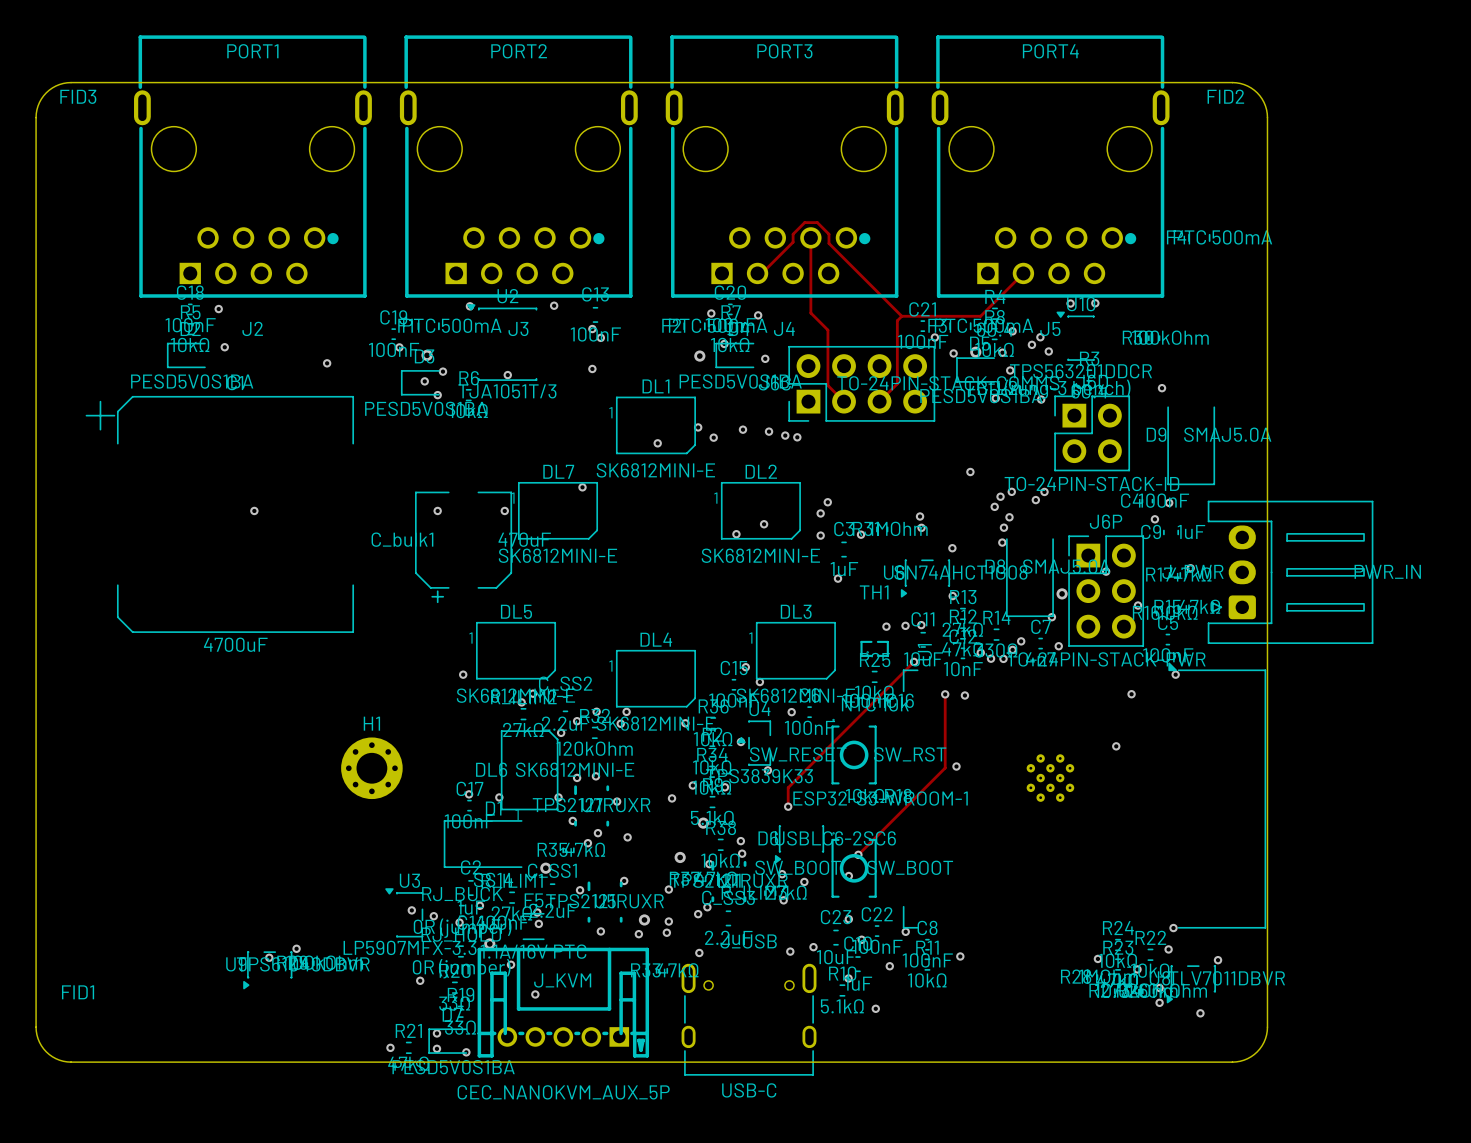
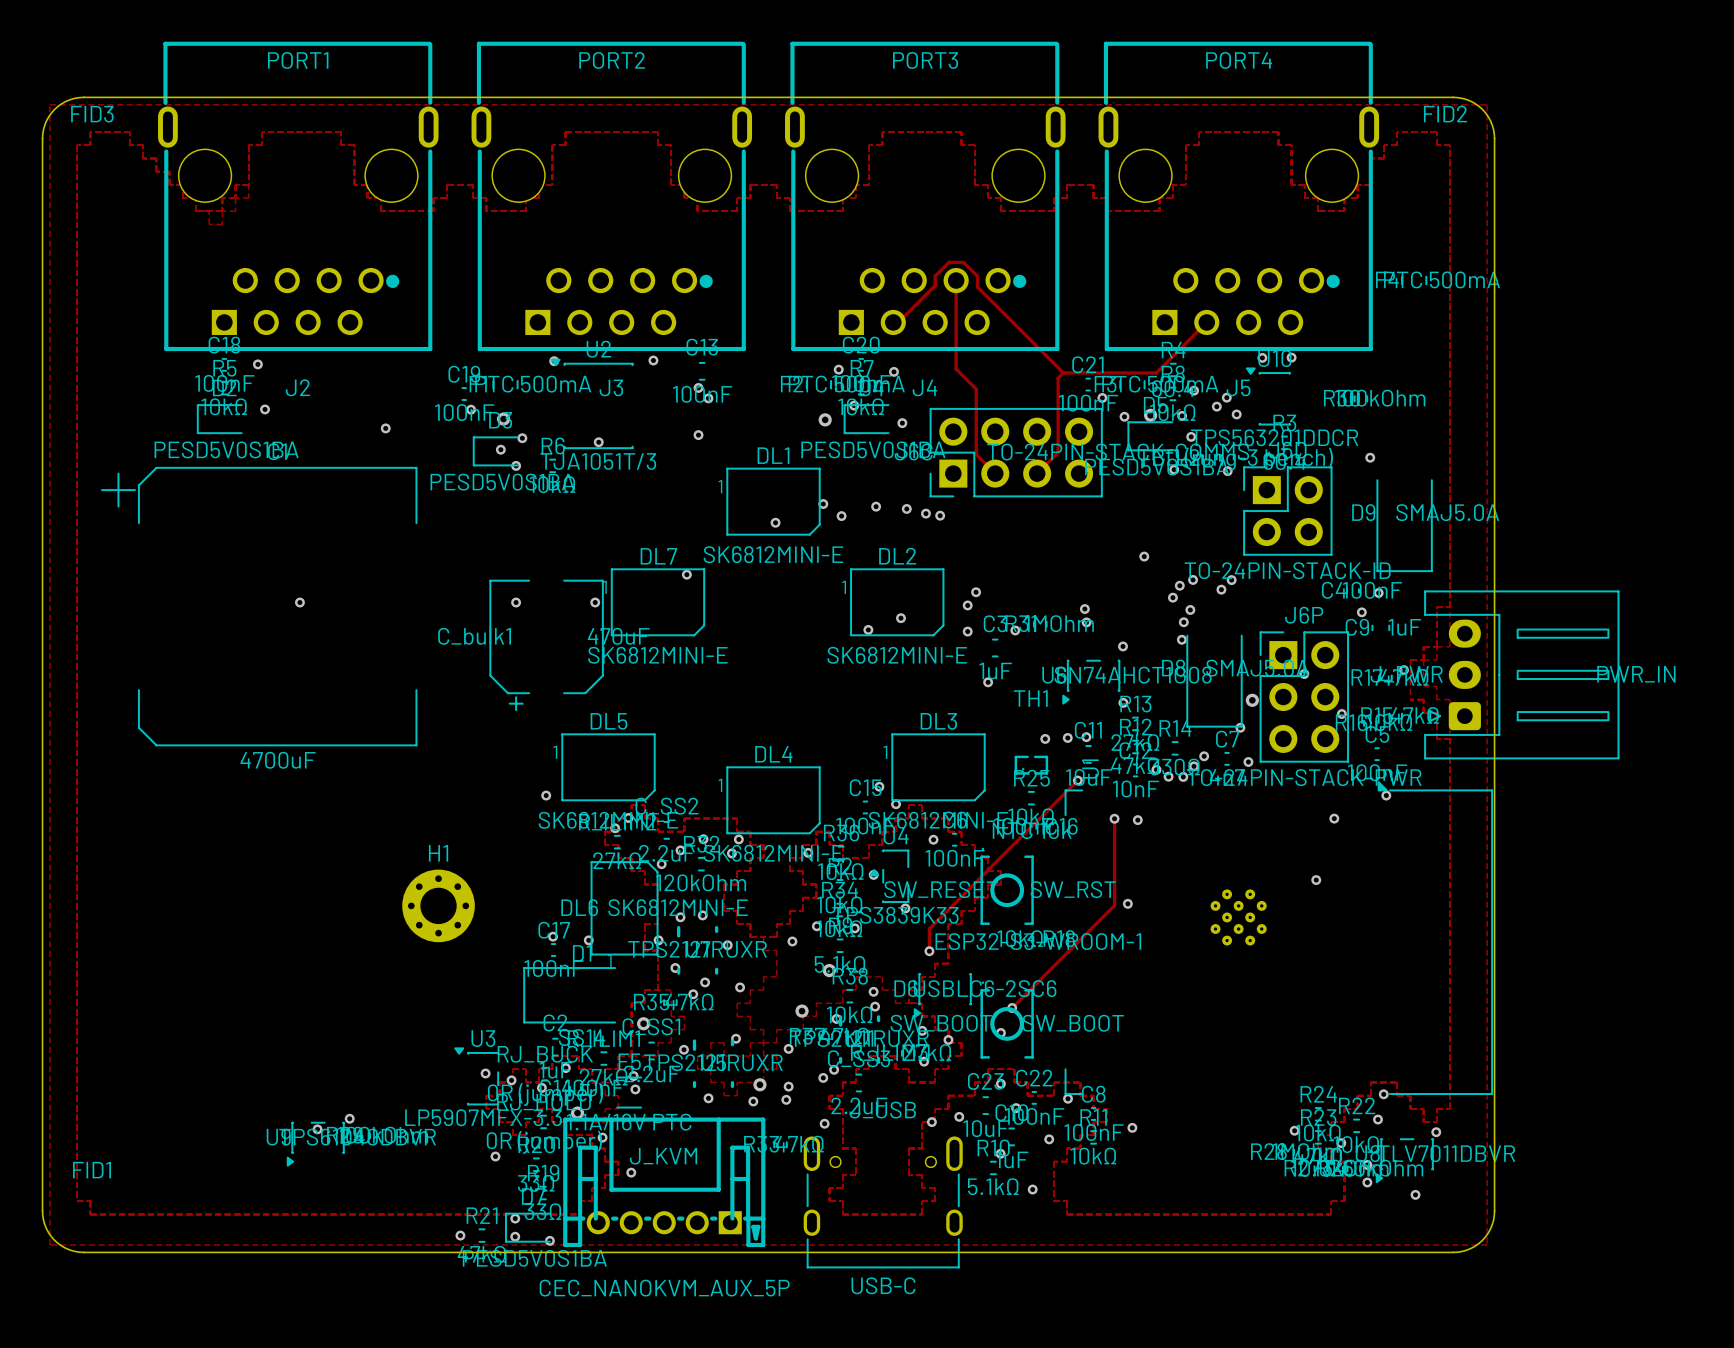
zone outline: none -> (49, 104) (1487, 104) (1487, 1244) (49, 1244) (49, 104)
zone outline: none -> (248, 184) (235, 184) (235, 211) (195, 211) (195, 198) (182, 198) (182, 184) (169, 184) (169, 171) (156, 171) (156, 158) (143, 158) (143, 145) (129, 145) (129, 132) (90, 132) (90, 145) (77, 145) (77, 1201) (90, 1201) (90, 1214) (578, 1214) (578, 1201) (591, 1201) (591, 1188) (605, 1188) (605, 1174) (618, 1174) (618, 1161) (605, 1161) (605, 1148) (591, 1148) (591, 1122) (605, 1122) (605, 1108) (618, 1108) (618, 1095) (605, 1095) (605, 1069) (631, 1069) (631, 1003) (644, 1003) (644, 990) (671, 990) (671, 1016) (684, 1016) (684, 1029) (671, 1029) (671, 1042) (657, 1042) (657, 1056) (618, 1056) (618, 1082) (591, 1082) (591, 1069) (578, 1069) (578, 1056) (552, 1056) (552, 1069) (539, 1069) (539, 1082) (525, 1082) (525, 1069) (512, 1069) (512, 1082) (499, 1082) (499, 1095) (486, 1095) (486, 1108) (499, 1108) (499, 1122) (512, 1122) (512, 1135) (525, 1135) (525, 1122) (539, 1122) (539, 1108) (552, 1108) (552, 1122) (565, 1122) (565, 1135) (591, 1135)
zone outline: none -> (209, 211) (209, 224) (222, 224) (222, 198) (248, 198) (248, 145) (261, 145) (261, 132) (341, 132) (341, 145) (354, 145) (354, 184) (367, 184) (367, 198) (380, 198) (380, 211) (433, 211) (433, 198) (446, 198) (446, 184) (473, 184) (473, 198) (486, 198) (486, 211) (525, 211) (525, 198) (539, 198) (539, 184) (552, 184) (552, 145) (565, 145) (565, 132) (657, 132) (657, 145) (671, 145) (671, 184) (684, 184) (684, 198) (697, 198) (697, 211) (737, 211) (737, 198) (750, 198) (750, 184) (776, 184) (776, 198) (789, 198) (789, 211) (842, 211) (842, 198) (855, 198) (855, 184) (869, 184) (869, 145) (882, 145) (882, 132) (961, 132) (961, 145) (974, 145) (974, 184) (987, 184) (987, 198) (1001, 198) (1001, 211) (1053, 211) (1053, 198) (1067, 198) (1067, 184) (1093, 184) (1093, 198) (1106, 198) (1106, 211) (1159, 211) (1159, 198) (1172, 198) (1172, 184) (1186, 184) (1186, 145) (1199, 145) (1199, 132) (1278, 132) (1278, 145) (1291, 145) (1291, 184) (1304, 184) (1304, 198) (1318, 198) (1318, 211) (1344, 211) (1344, 198) (1357, 198) (1357, 184) (1370, 184) (1370, 158) (1384, 158) (1384, 145) (1397, 145) (1397, 132) (1436, 132) (1436, 145) (1450, 145) (1450, 646) (1423, 646) (1423, 686) (1436, 686) (1436, 699) (1450, 699) (1450, 1108) (1436, 1108) (1436, 1122) (1423, 1122) (1423, 1108) (1410, 1108) (1410, 1095) (1397, 1095) (1397, 1082) (1370, 1082) (1370, 1095) (1357, 1095) (1357, 1108) (1344, 1108) (1344, 1122) (1331, 1122) (1331, 1135) (1318, 1135) (1318, 1148) (1331, 1148) (1331, 1161) (1344, 1161) (1344, 1201) (1331, 1201) (1331, 1214) (1067, 1214) (1067, 1201) (1053, 1201) (1053, 1161) (1067, 1161) (1067, 1148) (1080, 1148) (1080, 1135) (1093, 1135) (1093, 1122) (1106, 1122) (1106, 1108) (1093, 1108) (1093, 1095) (1080, 1095) (1080, 1082) (1053, 1082) (1053, 1095) (1027, 1095) (1027, 1082) (1014, 1082) (1014, 1069) (987, 1069) (987, 1082) (974, 1082) (974, 1095) (948, 1095) (948, 1108) (935, 1108) (935, 1122) (921, 1122) (921, 1148) (908, 1148) (908, 1174) (921, 1174) (921, 1188) (935, 1188) (935, 1201) (921, 1201) (921, 1214) (842, 1214) (842, 1201) (829, 1201) (829, 1188) (842, 1188) (842, 1174) (855, 1174) (855, 1148) (842, 1148) (842, 1108) (829, 1108) (829, 1095) (842, 1095) (842, 1082) (855, 1082) (855, 1069) (869, 1069) (869, 1056) (895, 1056) (895, 1069) (908, 1069) (908, 1082) (935, 1082) (935, 1069) (948, 1069) (948, 1056) (961, 1056) (961, 1042) (948, 1042) (948, 1029) (935, 1029) (935, 1016) (921, 1016) (921, 1003) (895, 1003) (895, 990) (882, 990) (882, 976) (855, 976) (855, 990) (842, 990) (842, 1003) (816, 1003) (816, 1016) (803, 1016) (803, 1029) (776, 1029) (776, 1042) (750, 1042) (750, 1056) (723, 1056) (723, 1042) (710, 1042) (710, 1056) (697, 1056) (697, 1069) (710, 1069) (710, 1082) (723, 1082) (723, 1095) (737, 1095) (737, 1082) (763, 1082) (763, 1069) (776, 1069) (776, 1056) (763, 1056) (763, 1029) (750, 1029) (750, 1016) (737, 1016) (737, 1003) (750, 1003) (750, 990) (763, 990) (763, 976) (776, 976) (776, 950) (763, 950) (763, 937)
zone outline: none -> (1450, 607) (1436, 607) (1436, 660) (1410, 660) (1410, 699) (1423, 699) (1423, 712) (1436, 712) (1436, 739) (1450, 739)
zone outline: none -> (657, 990) (657, 950) (644, 950) (644, 924) (657, 924) (657, 884) (644, 884) (644, 871) (631, 871) (631, 858) (618, 858) (618, 844) (605, 844) (605, 831) (618, 831) (618, 818) (631, 818) (631, 805) (644, 805) (644, 818) (657, 818) (657, 831) (684, 831) (684, 818) (737, 818) (737, 831) (750, 831) (750, 844) (763, 844) (763, 858) (750, 858) (750, 871) (737, 871) (737, 884) (723, 884) (723, 910) (737, 910) (737, 924) (750, 924) (750, 937) (776, 937) (776, 924) (789, 924) (789, 910) (803, 910) (803, 897) (816, 897) (816, 884) (803, 884) (803, 871) (789, 871) (789, 858) (803, 858) (803, 844) (816, 844) (816, 831) (829, 831) (829, 844) (842, 844) (842, 858) (869, 858) (869, 844) (882, 844) (882, 831) (895, 831) (895, 818) (908, 818) (908, 805) (921, 805) (921, 818) (948, 818) (948, 831) (961, 831) (961, 844) (974, 844) (974, 858) (987, 858) (987, 871) (1001, 871) (1001, 884) (987, 884) (987, 897) (974, 897) (974, 910) (961, 910) (961, 924) (948, 924) (948, 963) (935, 963) (935, 976) (921, 976) (921, 990) (908, 990) (908, 1003)

